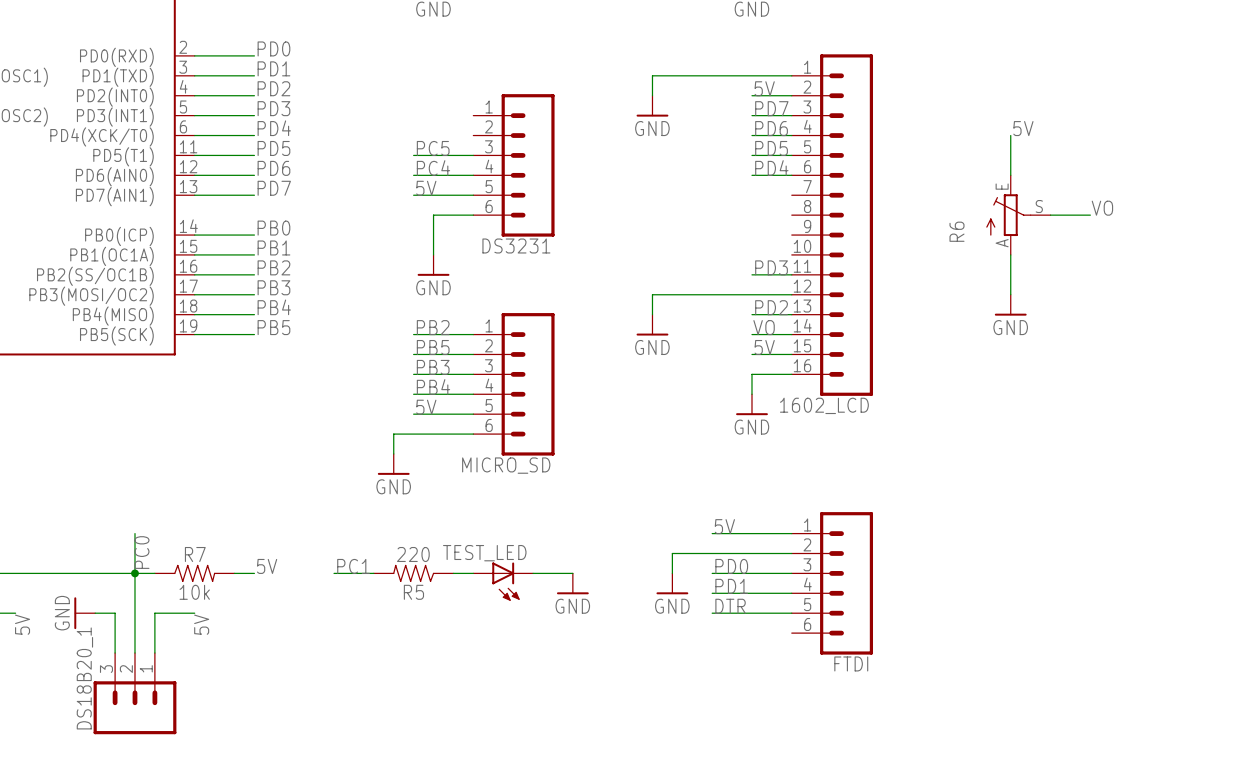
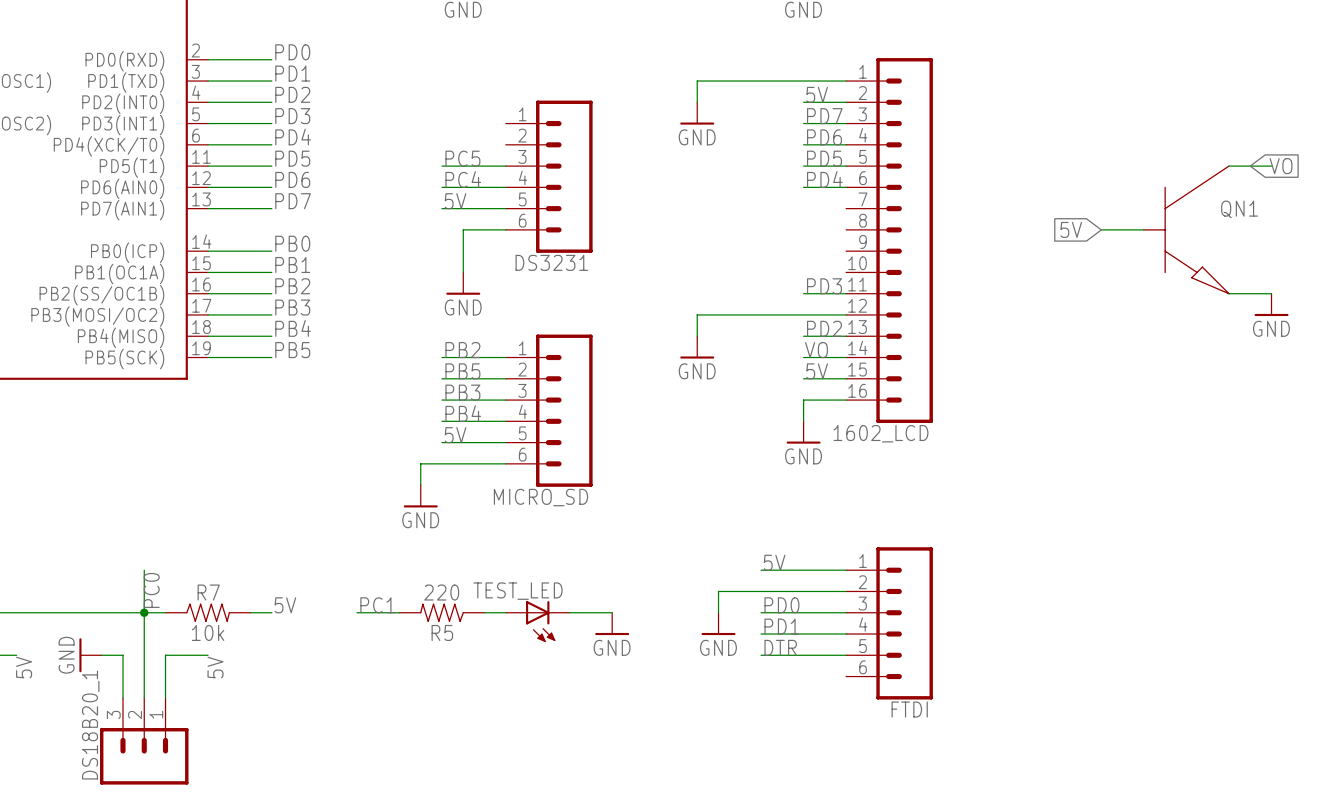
label: 5V (1023, 128) -> none
wire: (1010, 135) (1010, 175) -> none
wire: none -> (1228, 166) (1271, 166)
global label: none -> VO (1281, 166)
label: VO (1102, 208) -> none
global label: none -> 5V (1071, 229)
R6: (1018, 215) -> none
QN1: none -> (1186, 229)
wire: (1010, 254) (1010, 294) -> none
wire: none -> (1228, 293) (1271, 293)
power symbol position: GND (1010, 305) -> GND (1271, 304)

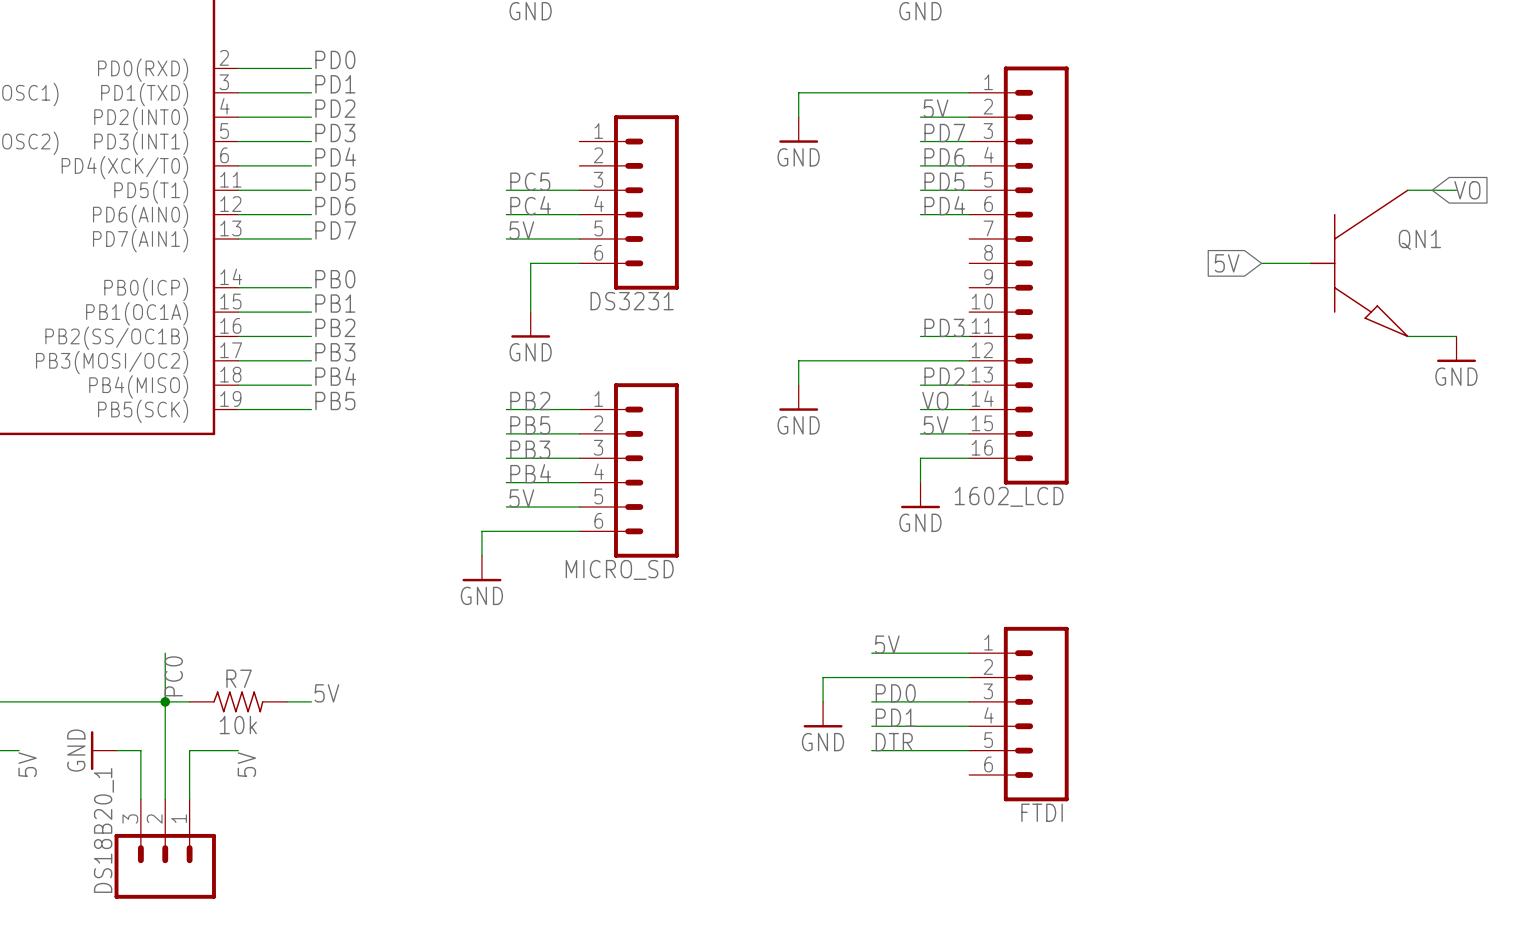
label: PC1 (377, 605) -> none
wire: (356, 612) (399, 612) -> none
R5: 220 (442, 612) -> none
wire: (484, 612) (505, 612) -> none
wire: (569, 612) (612, 612) -> none
TEST_LED: (537, 621) -> none
power symbol: GND (612, 623) -> none

